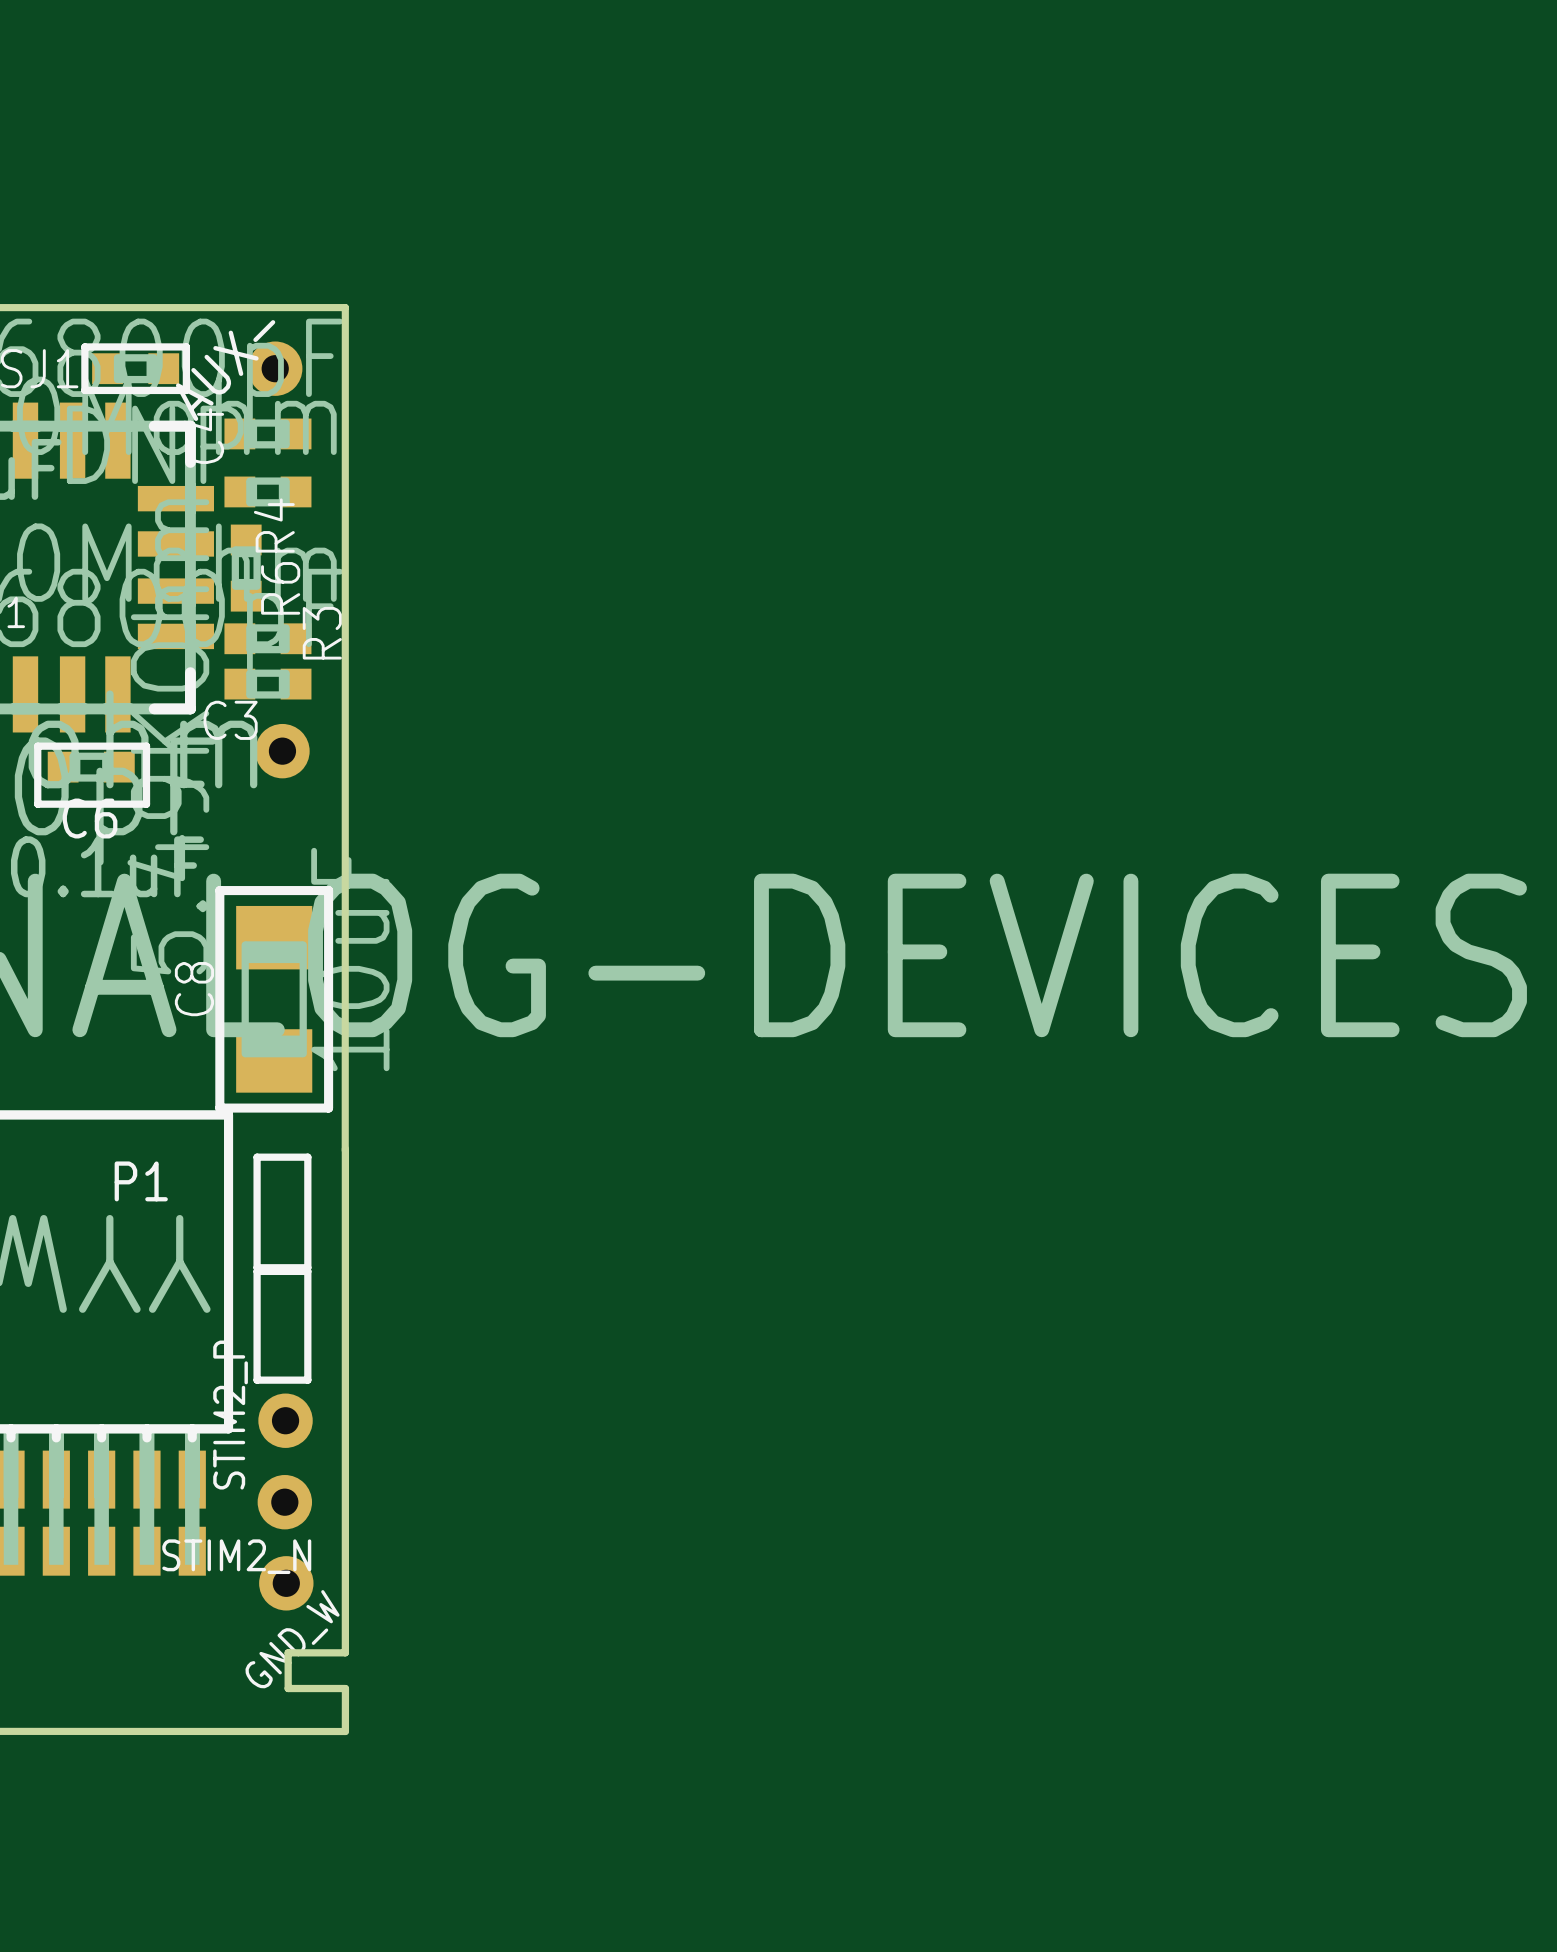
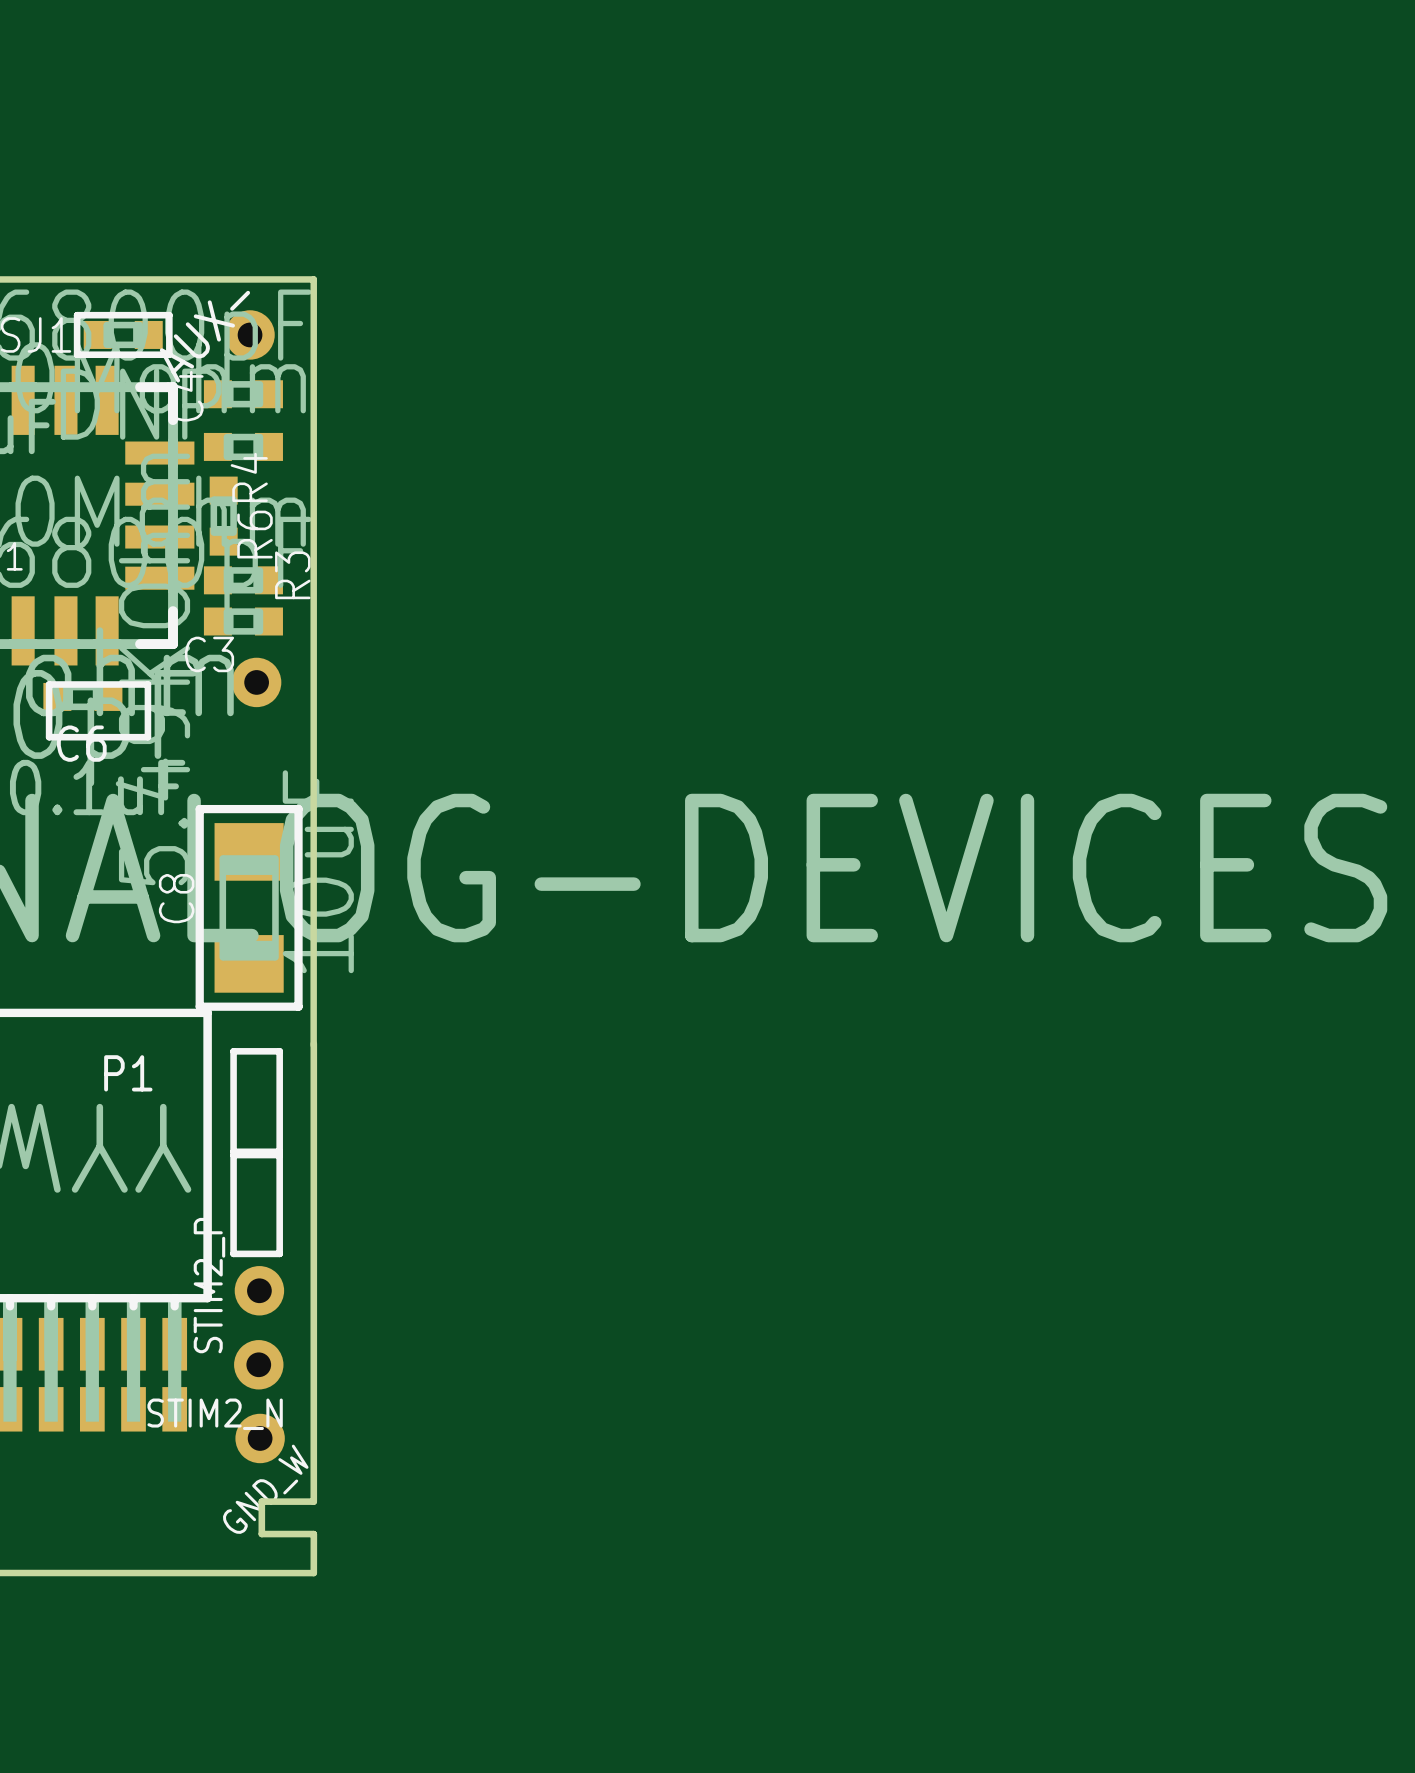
line: (37, 746) (146, 746) (146, 804) (37, 804) (37, 746) -> (49, 684) (147, 684) (147, 737) (49, 737) (49, 684)

